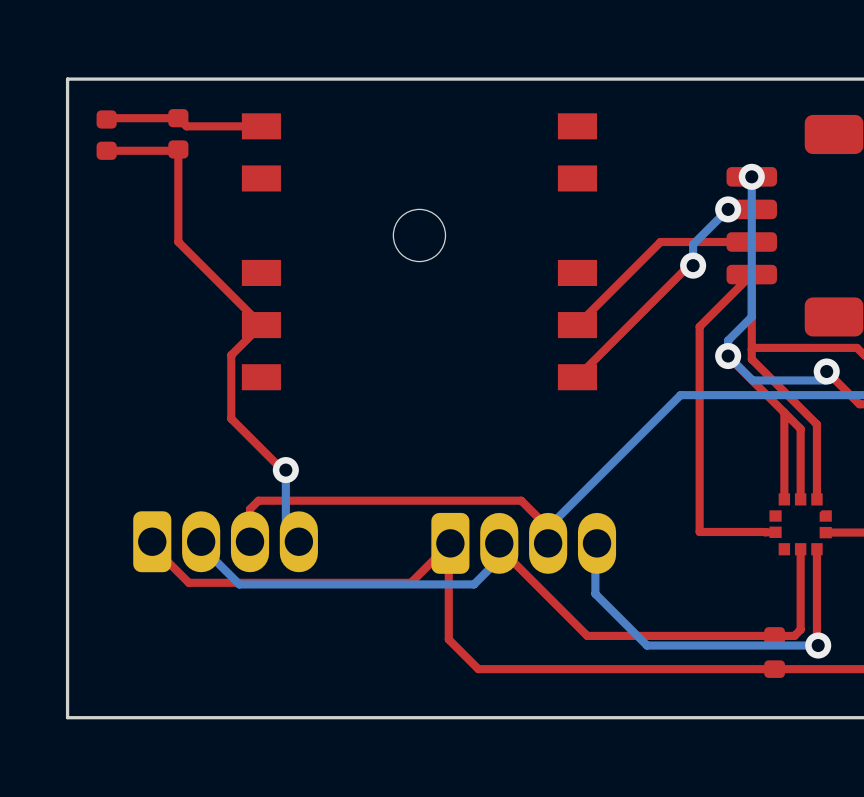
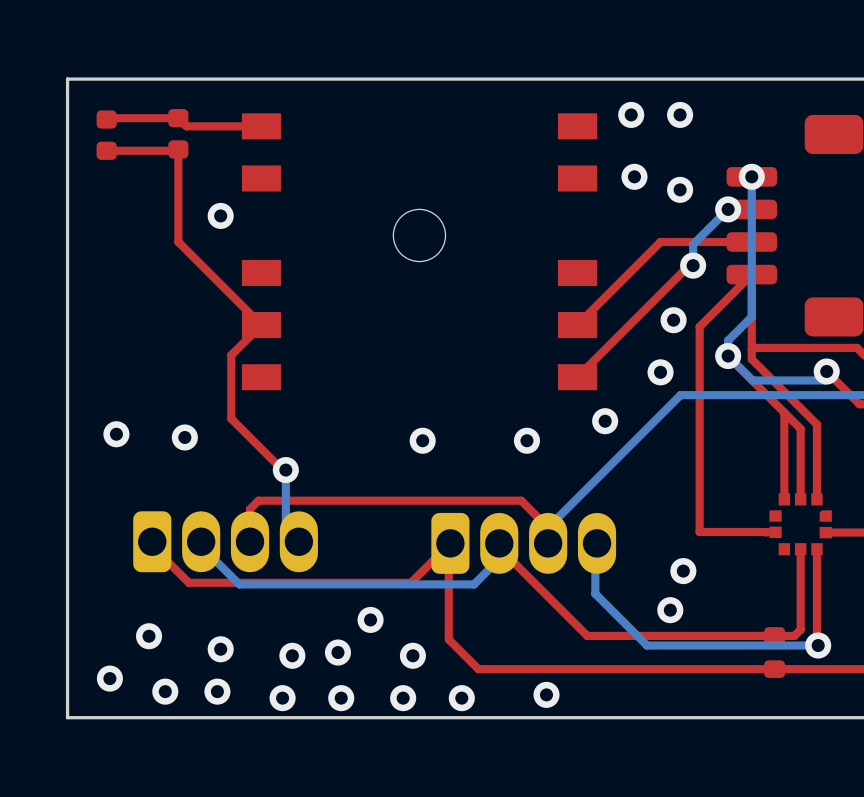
via: none -> (631, 114)
via: none -> (680, 114)
via: none -> (634, 176)
via: none -> (680, 189)
via: none -> (220, 215)
via: none -> (673, 320)
via: none -> (660, 372)
via: none -> (605, 421)
via: none -> (116, 434)
via: none -> (184, 437)
via: none -> (422, 440)
via: none -> (526, 440)
via: none -> (683, 571)
via: none -> (670, 610)
via: none -> (370, 619)
via: none -> (149, 636)
via: none -> (220, 649)
via: none -> (337, 652)
via: none -> (292, 655)
via: none -> (412, 655)
via: none -> (109, 678)
via: none -> (165, 691)
via: none -> (217, 691)
via: none -> (546, 694)
via: none -> (282, 698)
via: none -> (341, 698)
via: none -> (403, 698)
via: none -> (461, 698)

